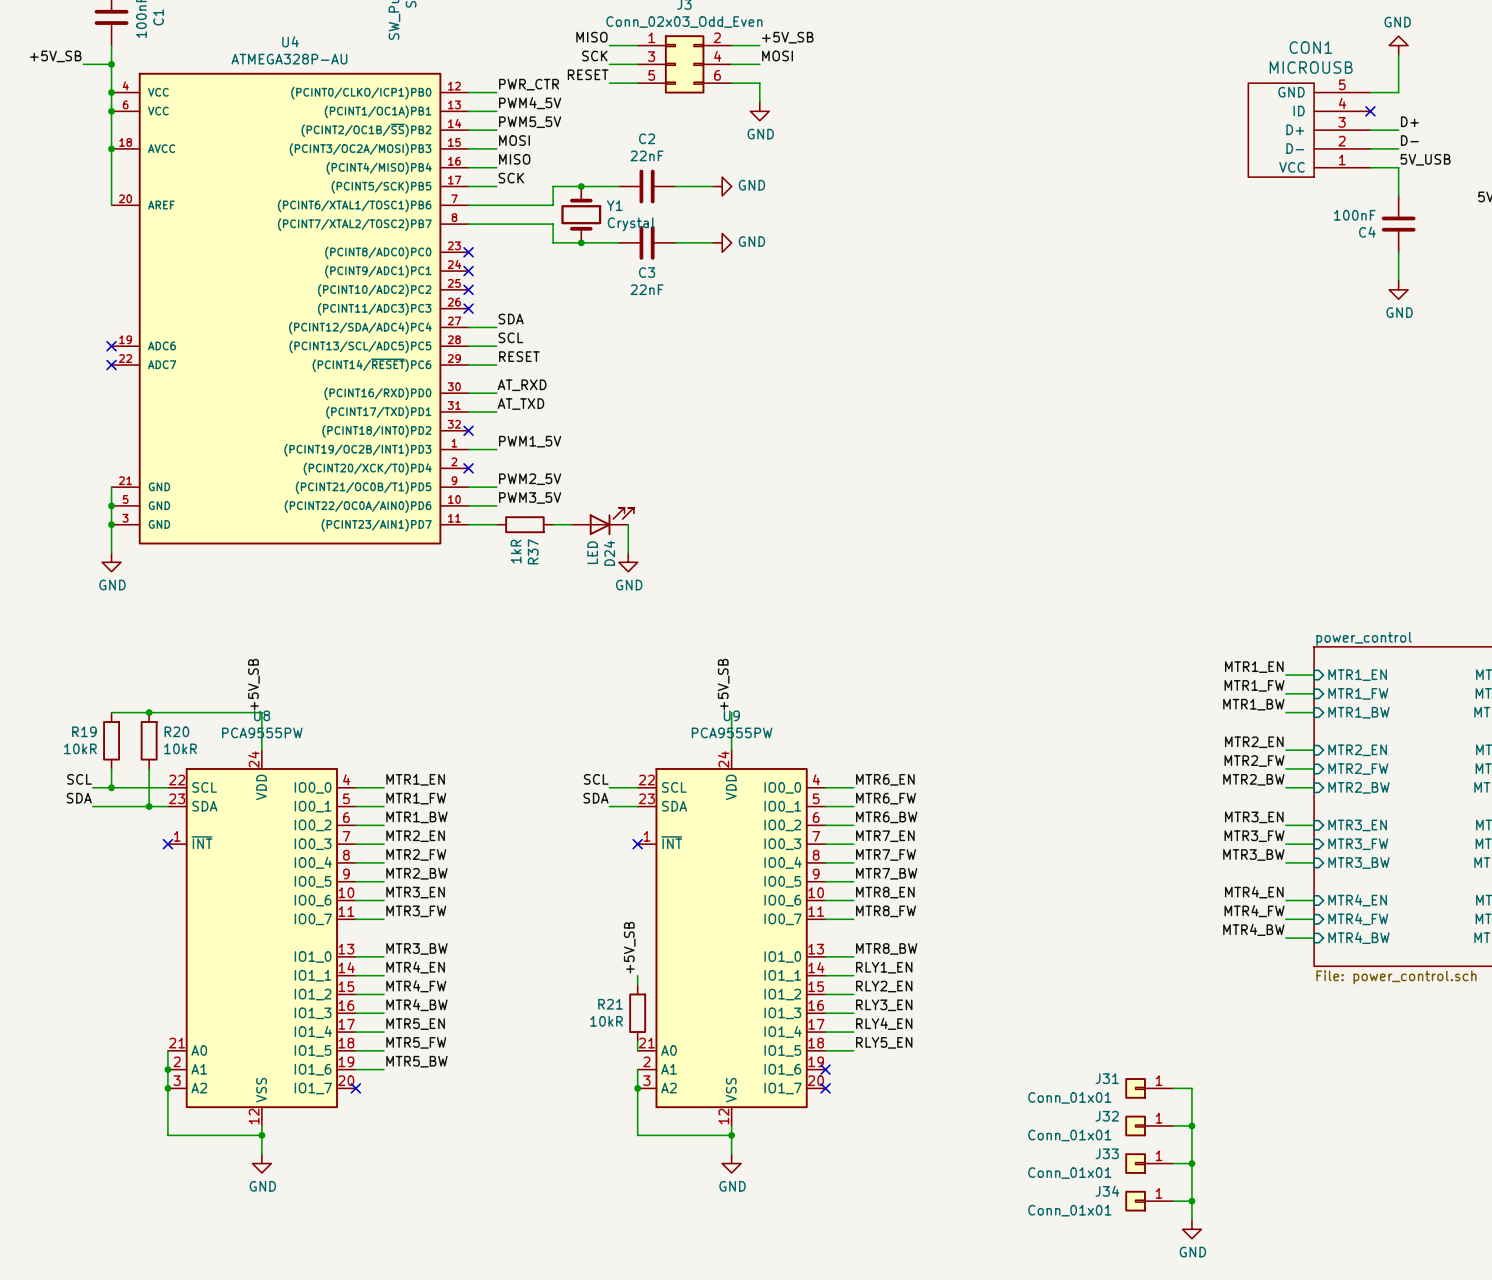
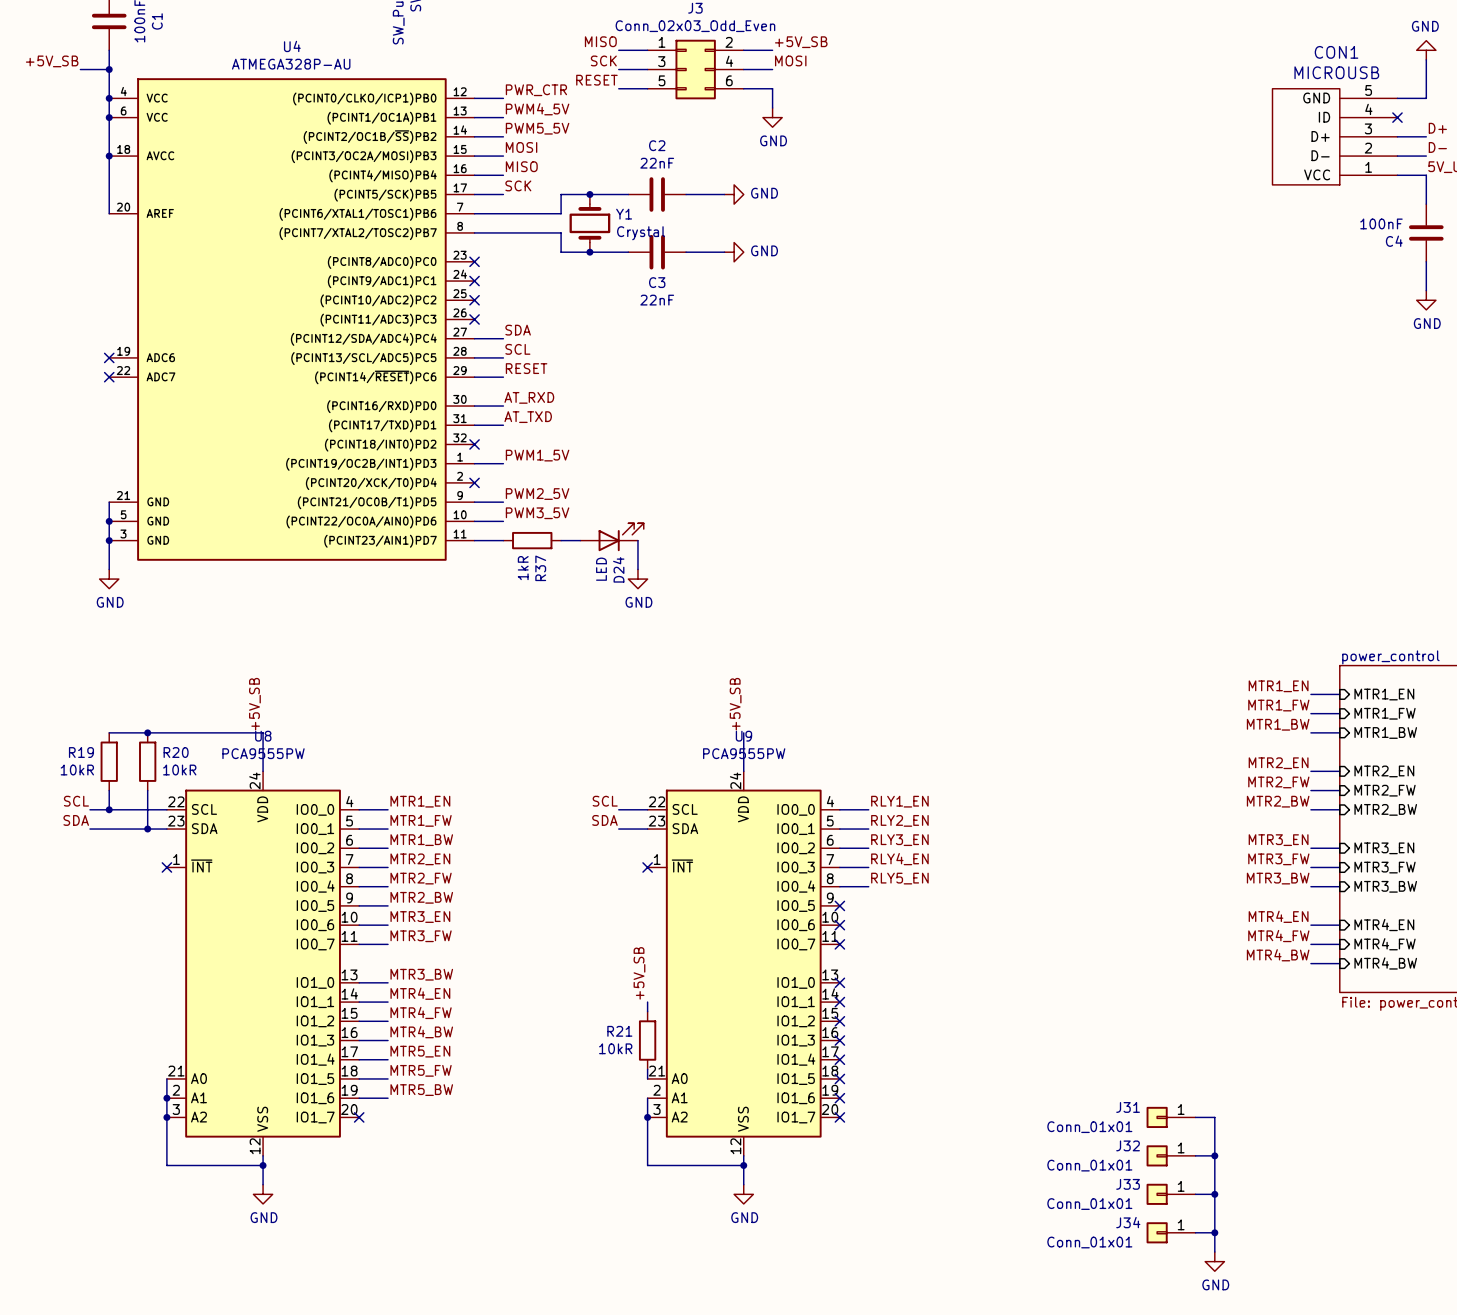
label: MTR6_EN (885, 779) -> RLY1_EN (899, 801)
label: MTR6_FW (886, 798) -> RLY2_EN (899, 820)
label: MTR6_BW (886, 817) -> RLY3_EN (899, 840)
label: MTR7_EN (885, 836) -> RLY4_EN (899, 859)
label: MTR7_FW (886, 854) -> RLY5_EN (899, 878)
label: MTR7_BW (886, 873) -> none
wire: (825, 881) (853, 881) -> none
no-connect mark: none -> (839, 905)
label: MTR8_EN (885, 892) -> none
wire: (825, 900) (853, 900) -> none
no-connect mark: none -> (839, 925)
label: MTR8_FW (886, 911) -> none
wire: (825, 919) (853, 919) -> none
no-connect mark: none -> (839, 944)
label: MTR8_BW (886, 948) -> none
wire: (825, 956) (853, 956) -> none
no-connect mark: none -> (839, 982)
label: RLY1_EN (884, 967) -> none
wire: (825, 975) (853, 975) -> none
no-connect mark: none -> (839, 1002)
label: RLY2_EN (884, 986) -> none
wire: (825, 994) (853, 994) -> none
no-connect mark: none -> (839, 1021)
label: RLY3_EN (884, 1005) -> none
wire: (825, 1013) (853, 1013) -> none
no-connect mark: none -> (839, 1040)
label: RLY4_EN (884, 1023) -> none
wire: (825, 1032) (853, 1032) -> none
no-connect mark: none -> (839, 1059)
label: RLY5_EN (884, 1042) -> none
wire: (825, 1050) (853, 1050) -> none
no-connect mark: none -> (839, 1078)

